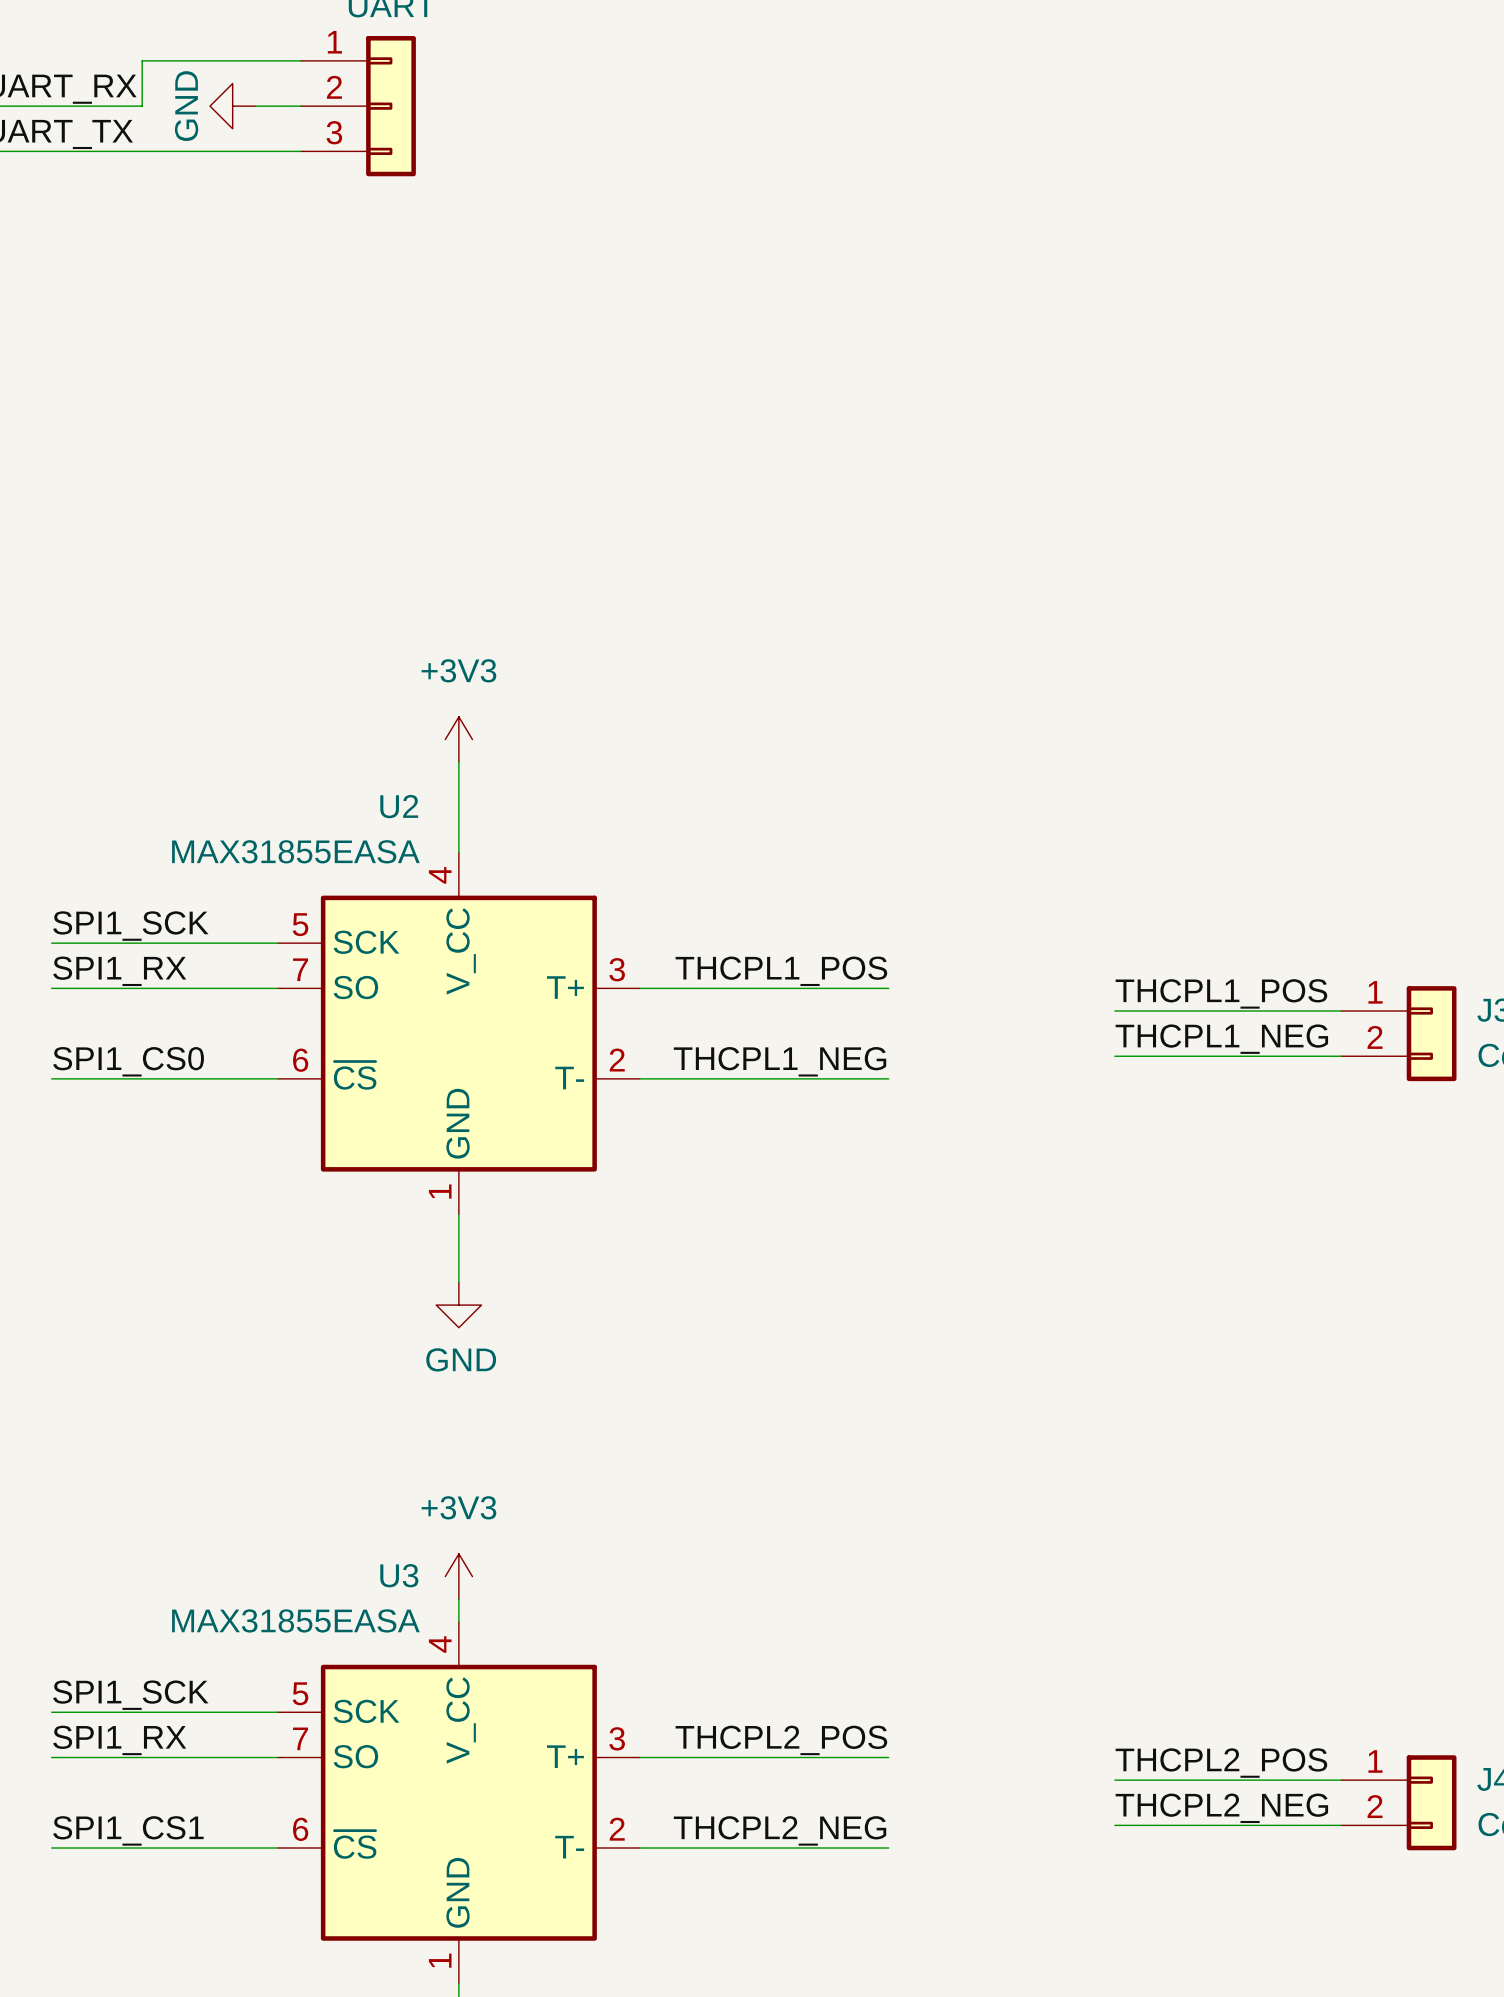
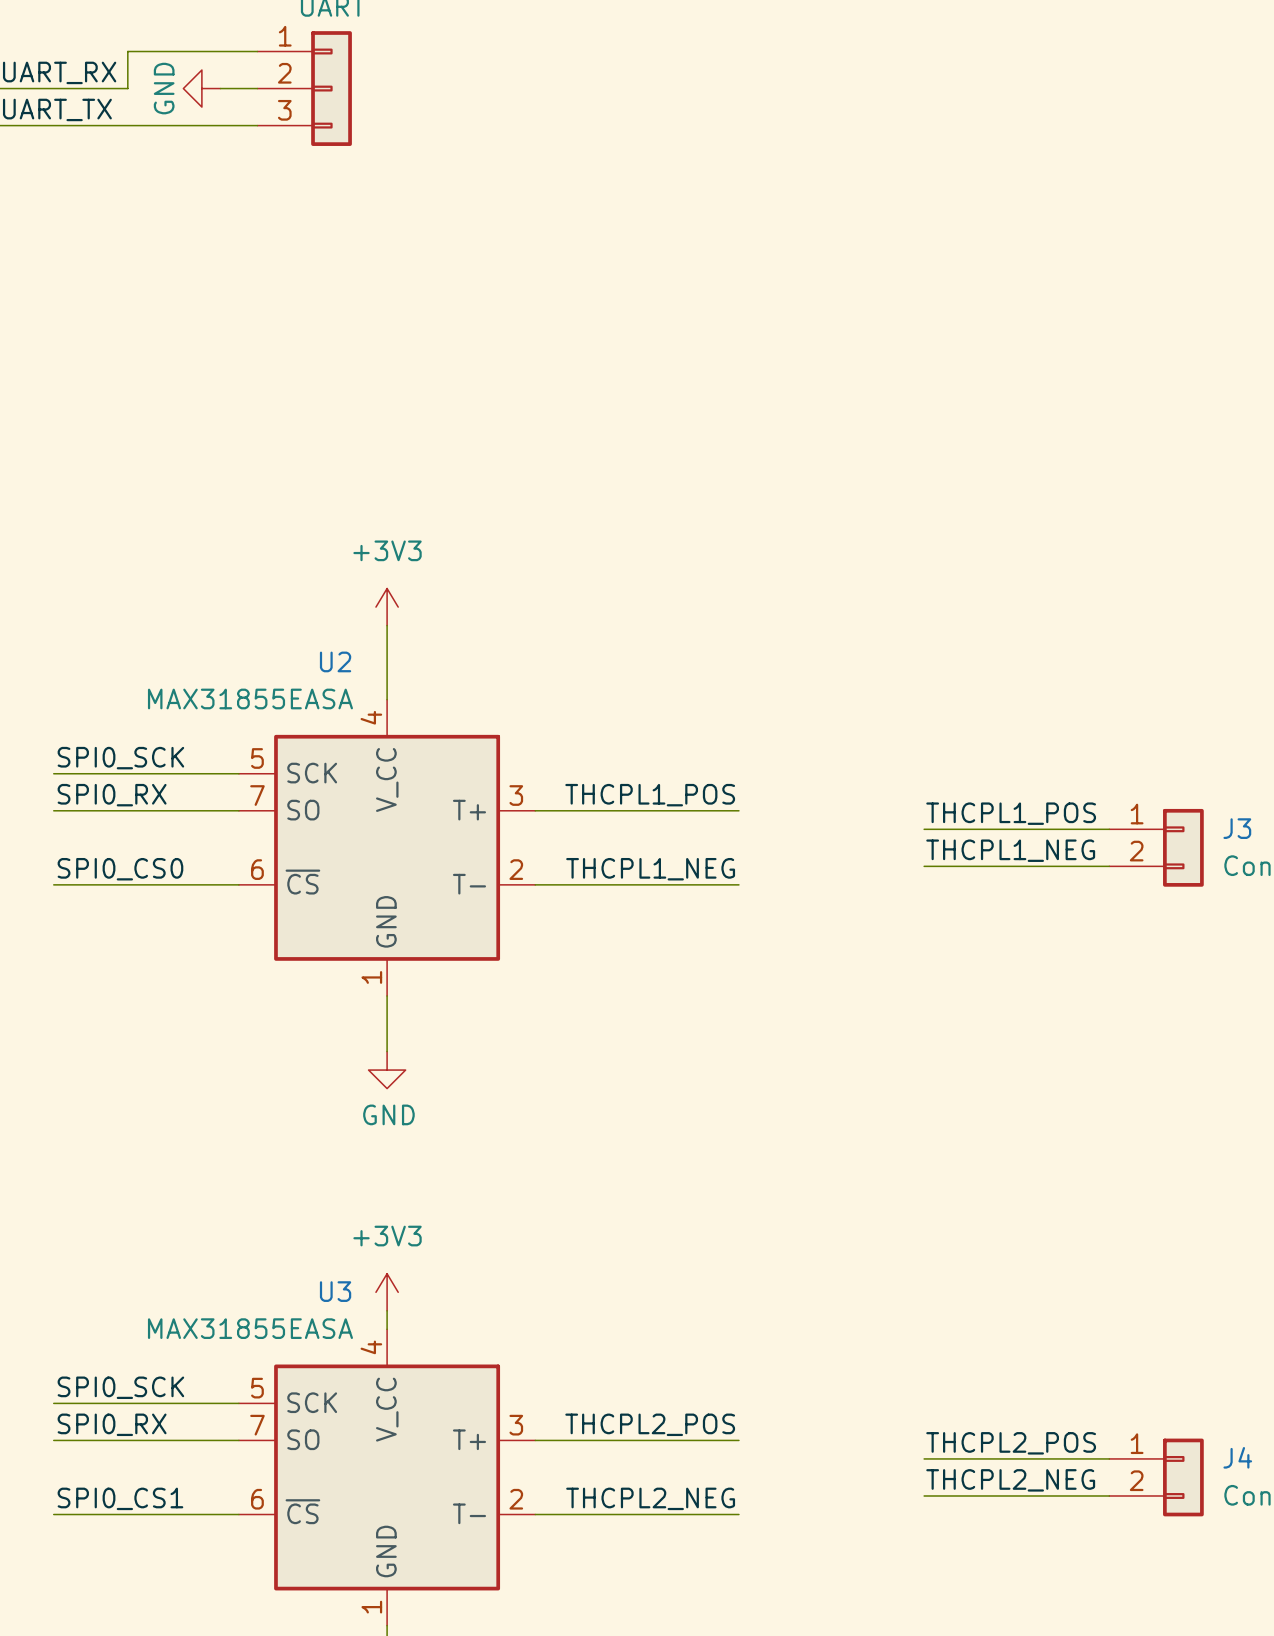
label: SPI1_SCK (130, 926) -> SPI0_SCK (120, 758)
label: SPI1_RX (119, 971) -> SPI0_RX (112, 795)
label: SPI1_CS0 (128, 1061) -> SPI0_CS0 (120, 869)
label: SPI1_SCK (130, 1695) -> SPI0_SCK (120, 1387)
label: SPI1_RX (119, 1740) -> SPI0_RX (112, 1424)
label: SPI1_CS1 (128, 1830) -> SPI0_CS1 (120, 1498)

